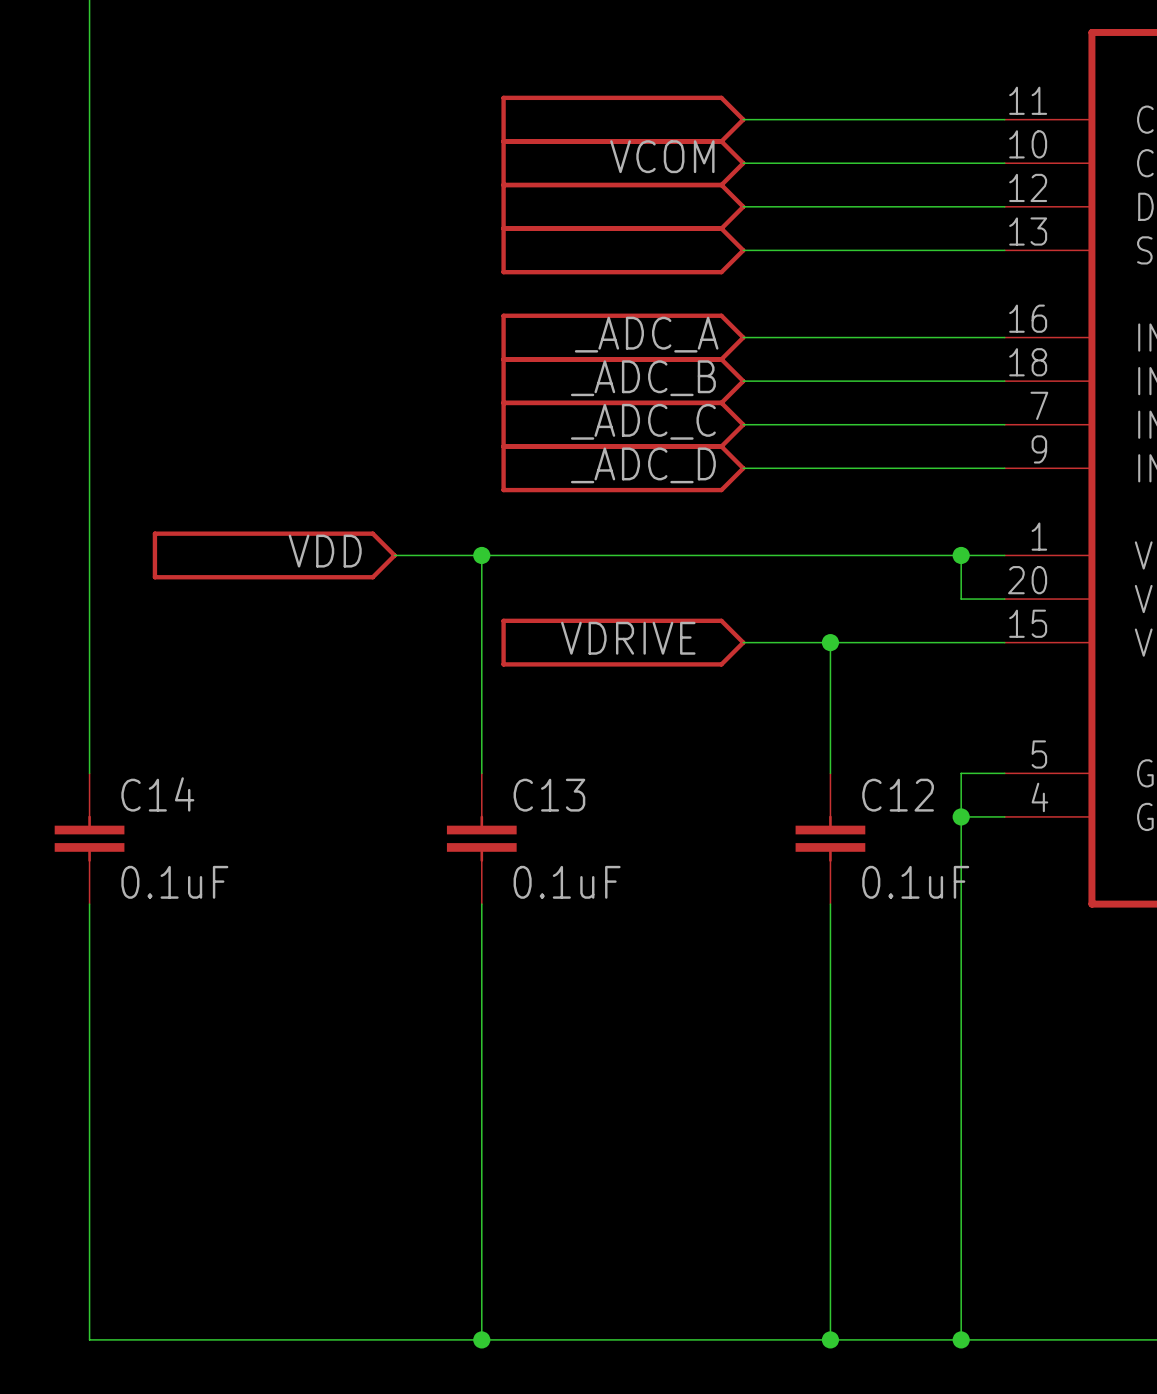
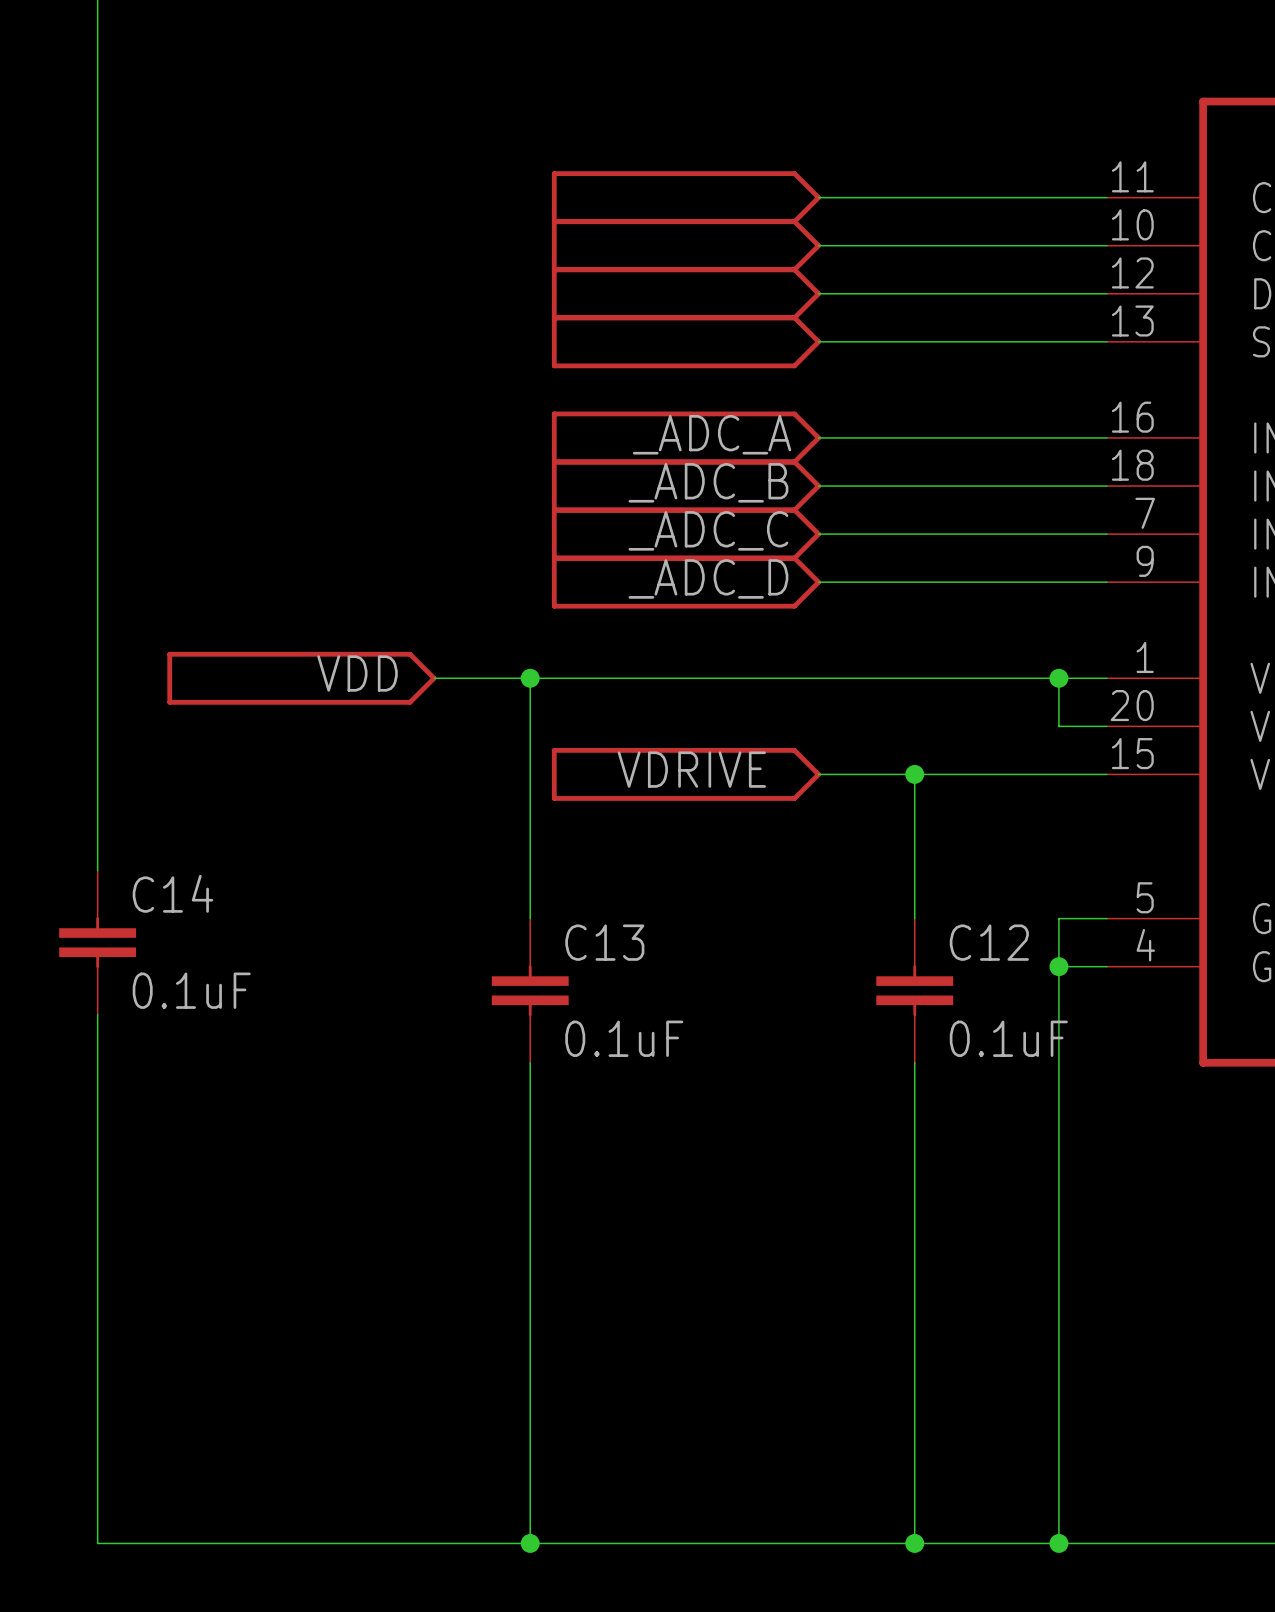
label: VCOM (662, 156) -> none
C14 position: (89, 838) -> (97, 942)

